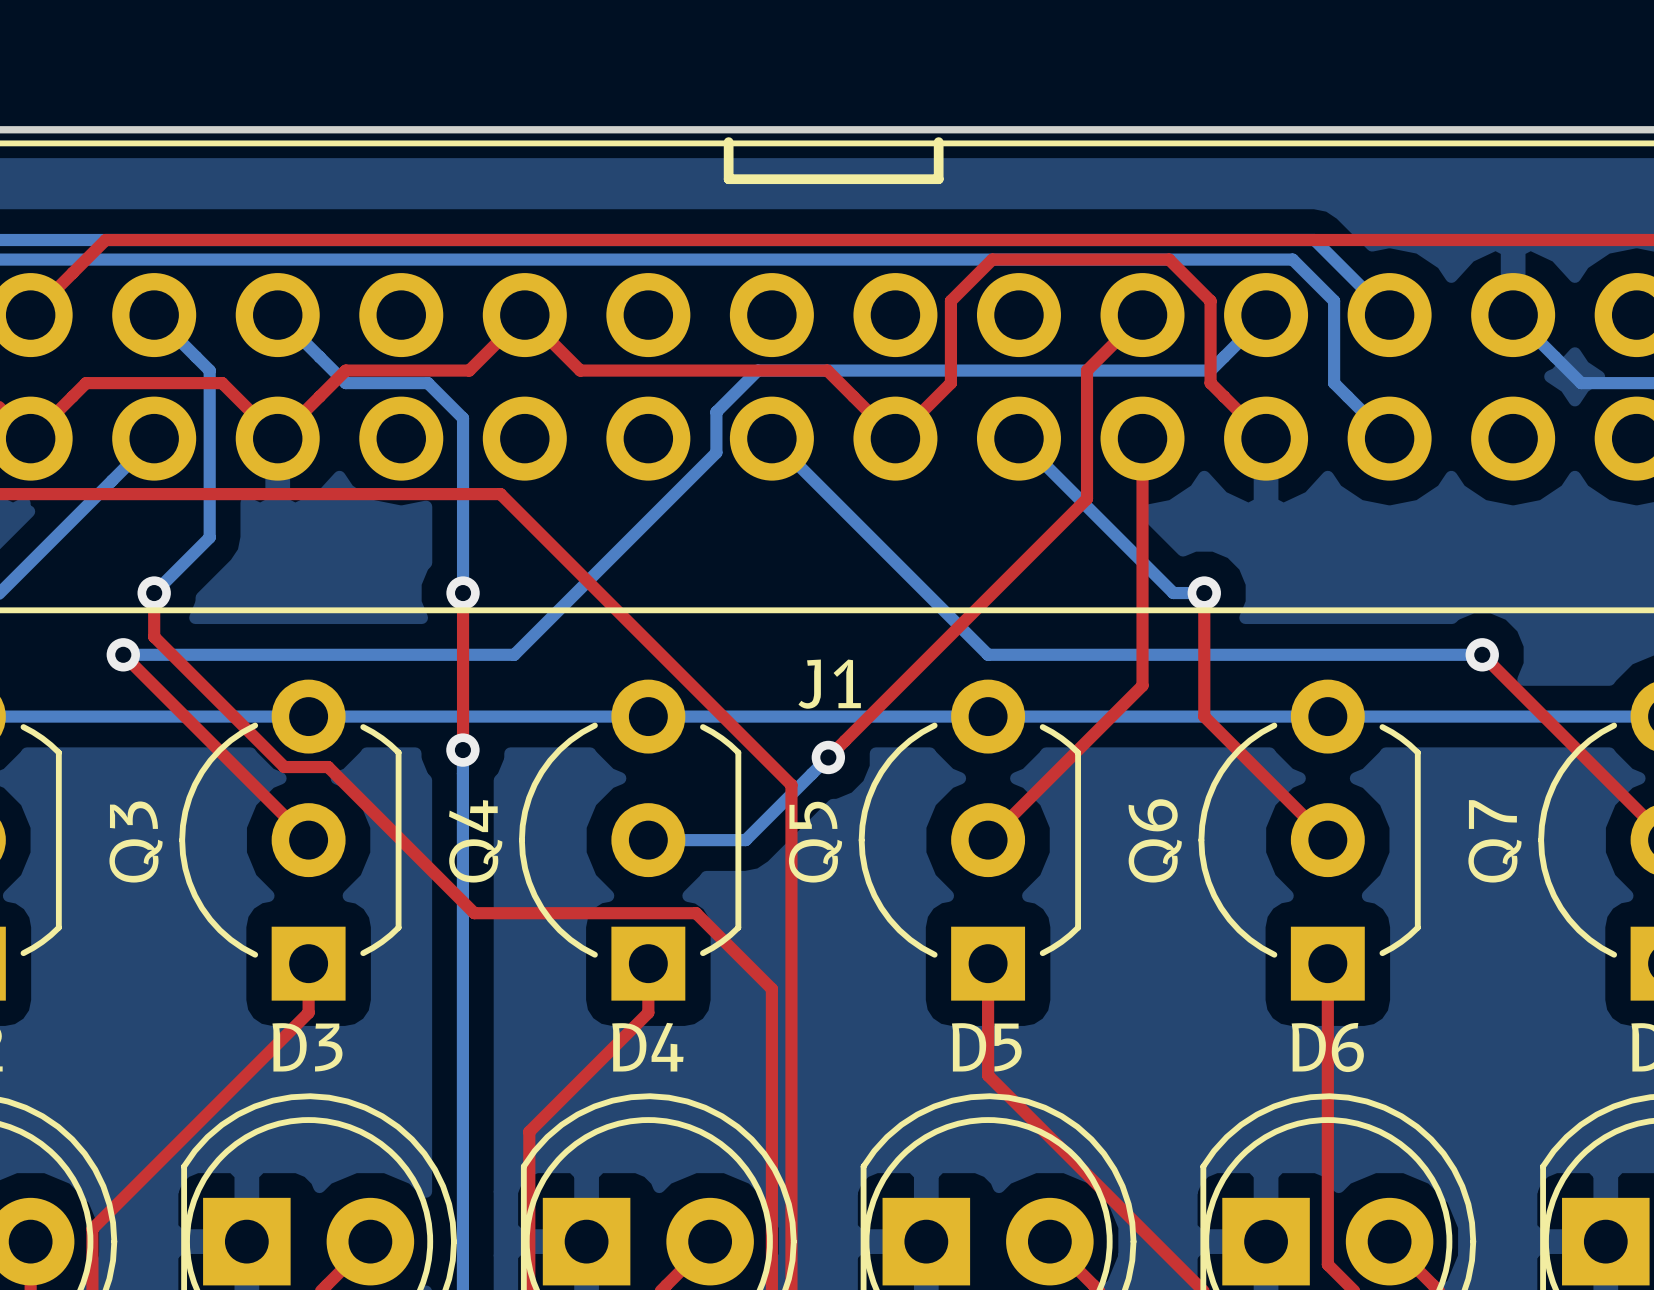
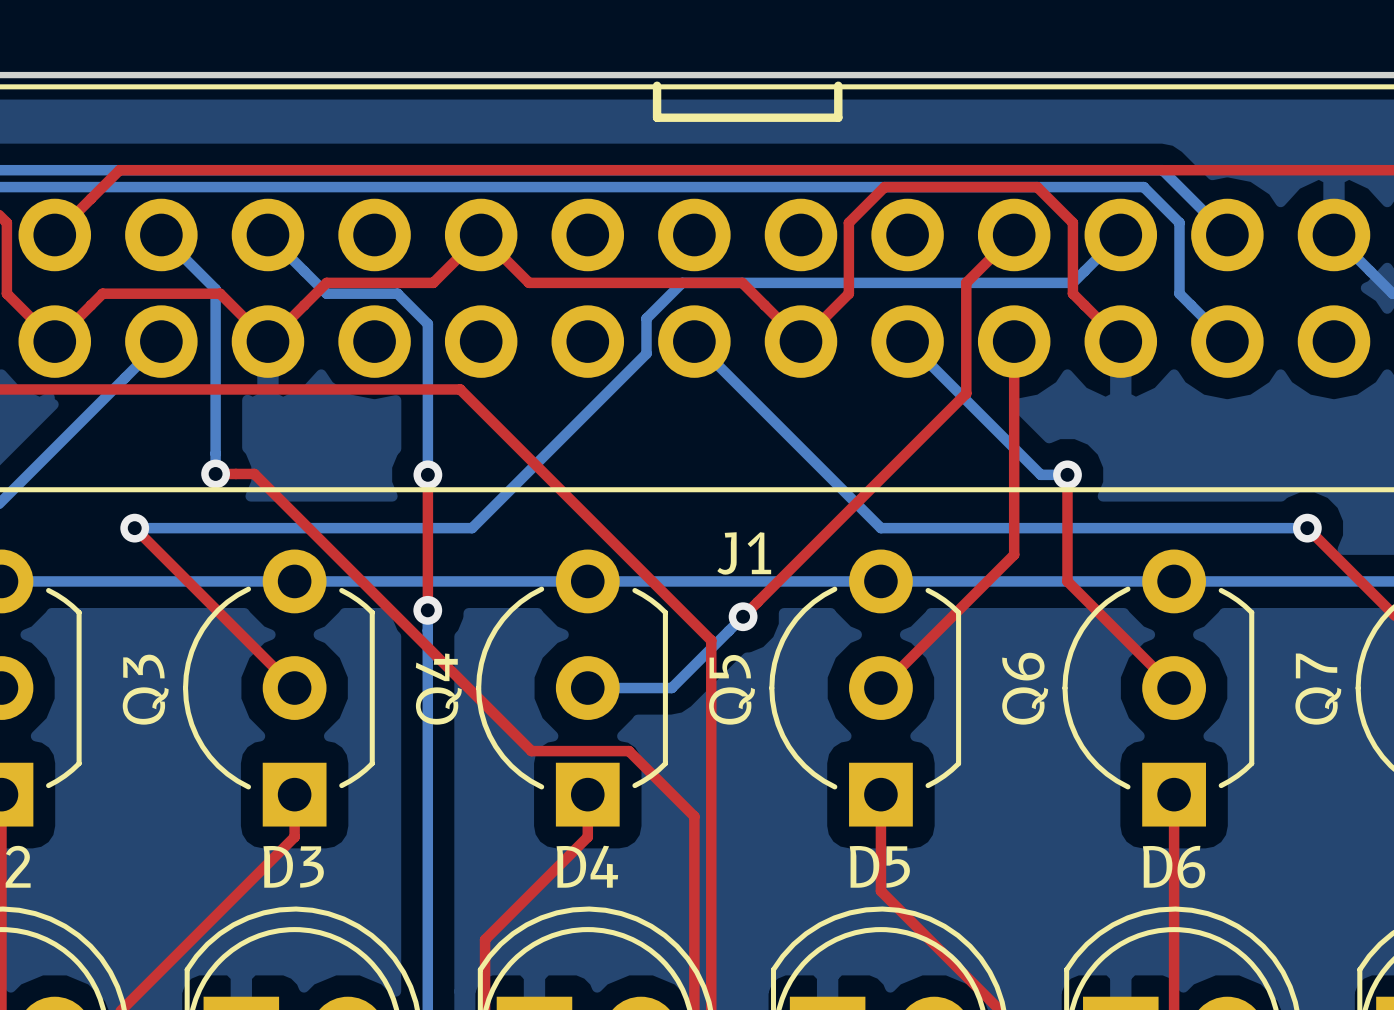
bottom track: (209, 370) (209, 537) (154, 593) -> (209, 282) (215, 289) (215, 473)
top track: (154, 593) (154, 636) (284, 767) (328, 767) (474, 913) (583, 913) -> (215, 473) (254, 473) (531, 751)
via position: (154, 593) -> (215, 473)

